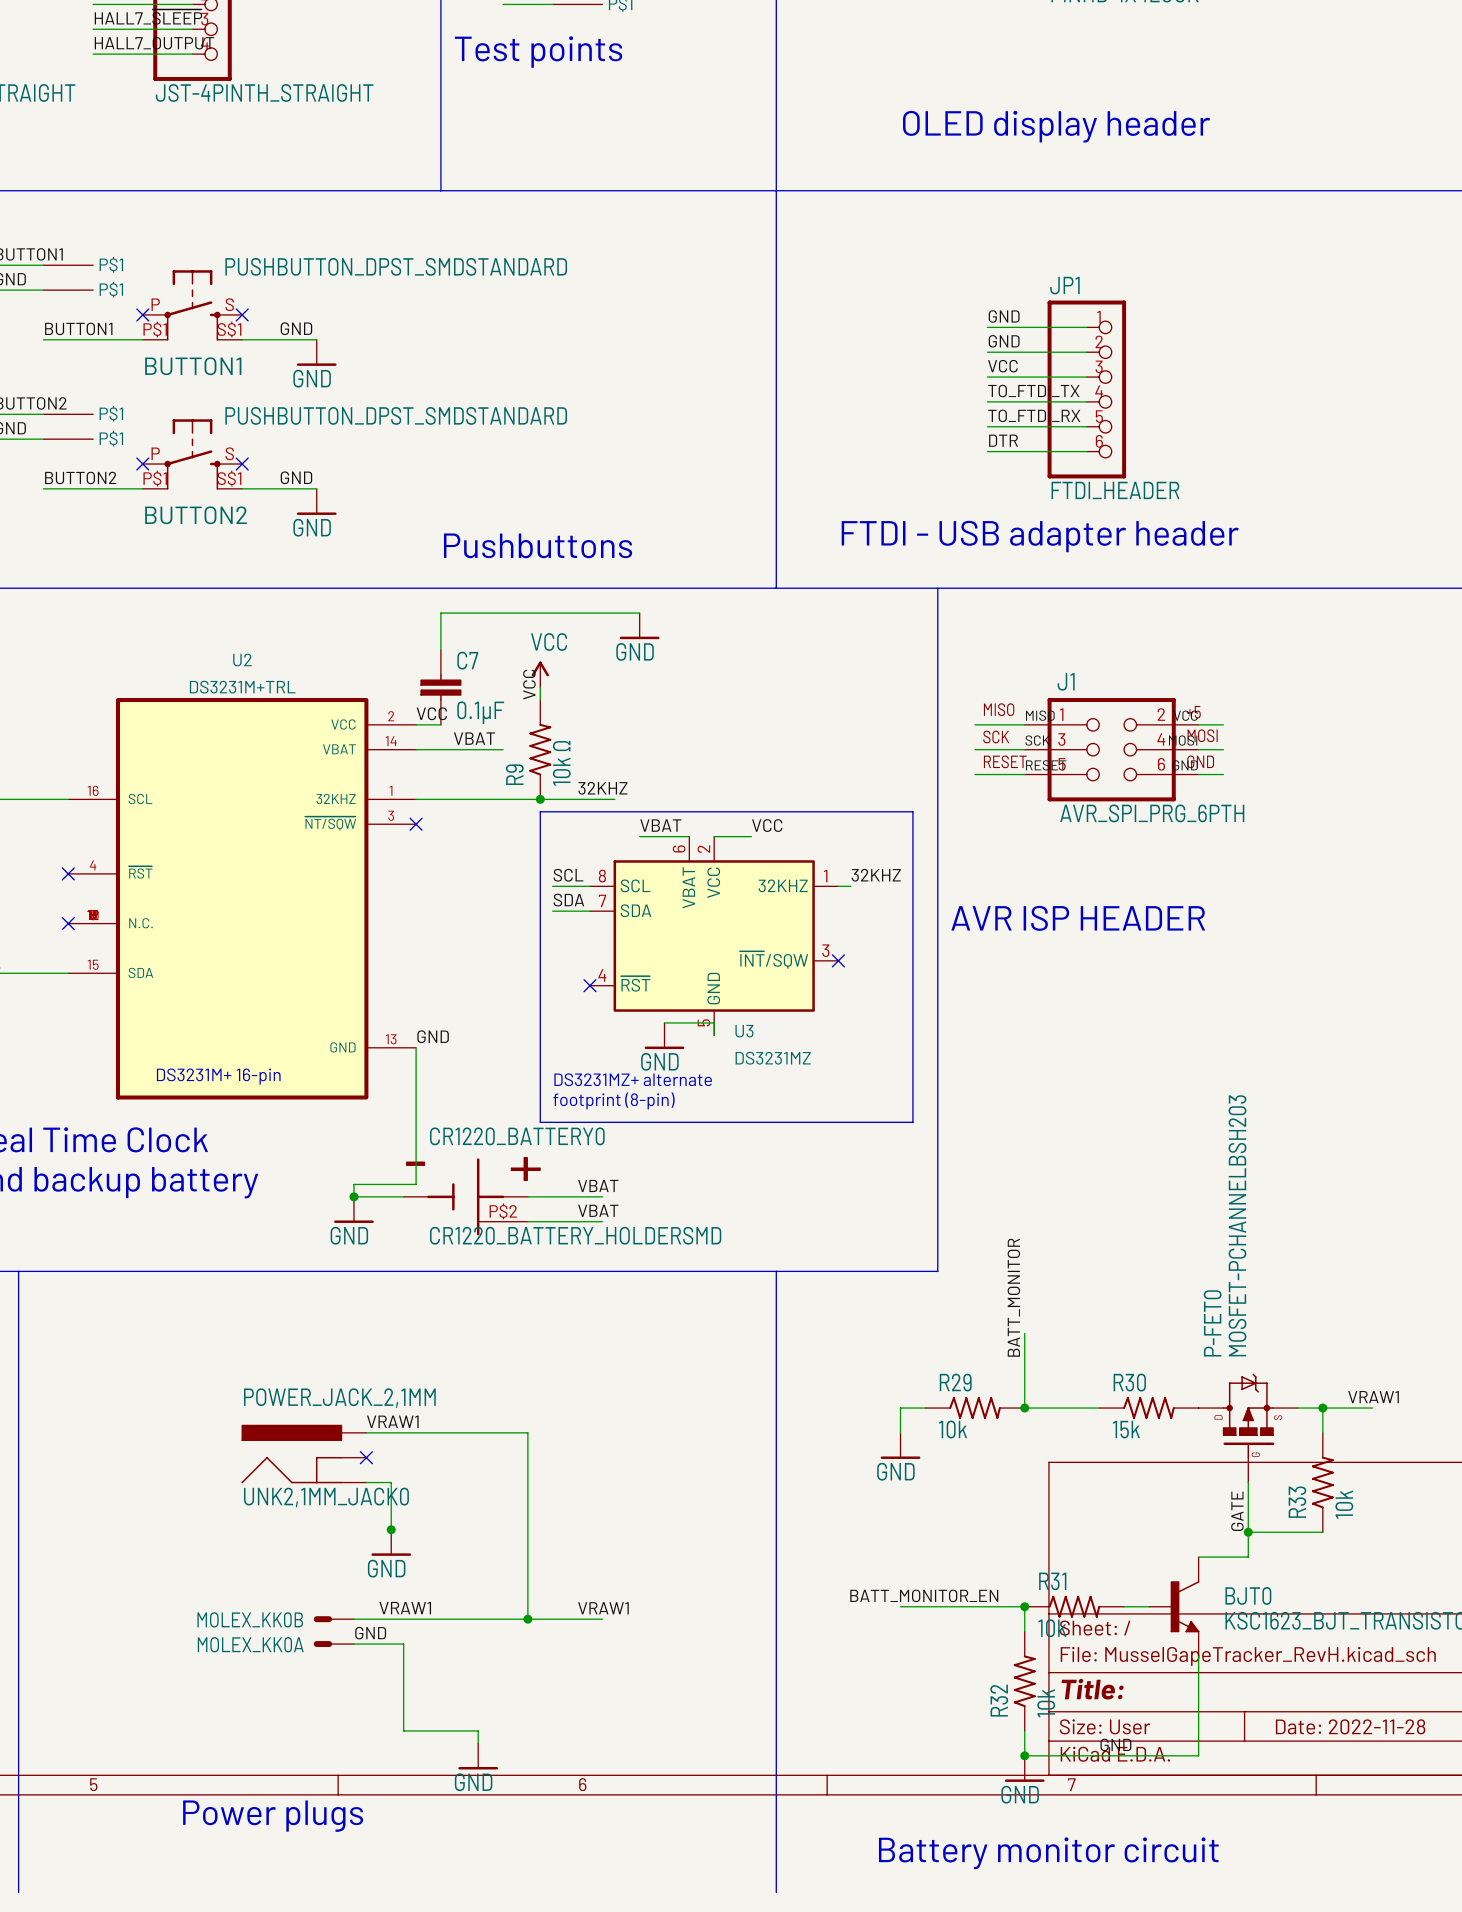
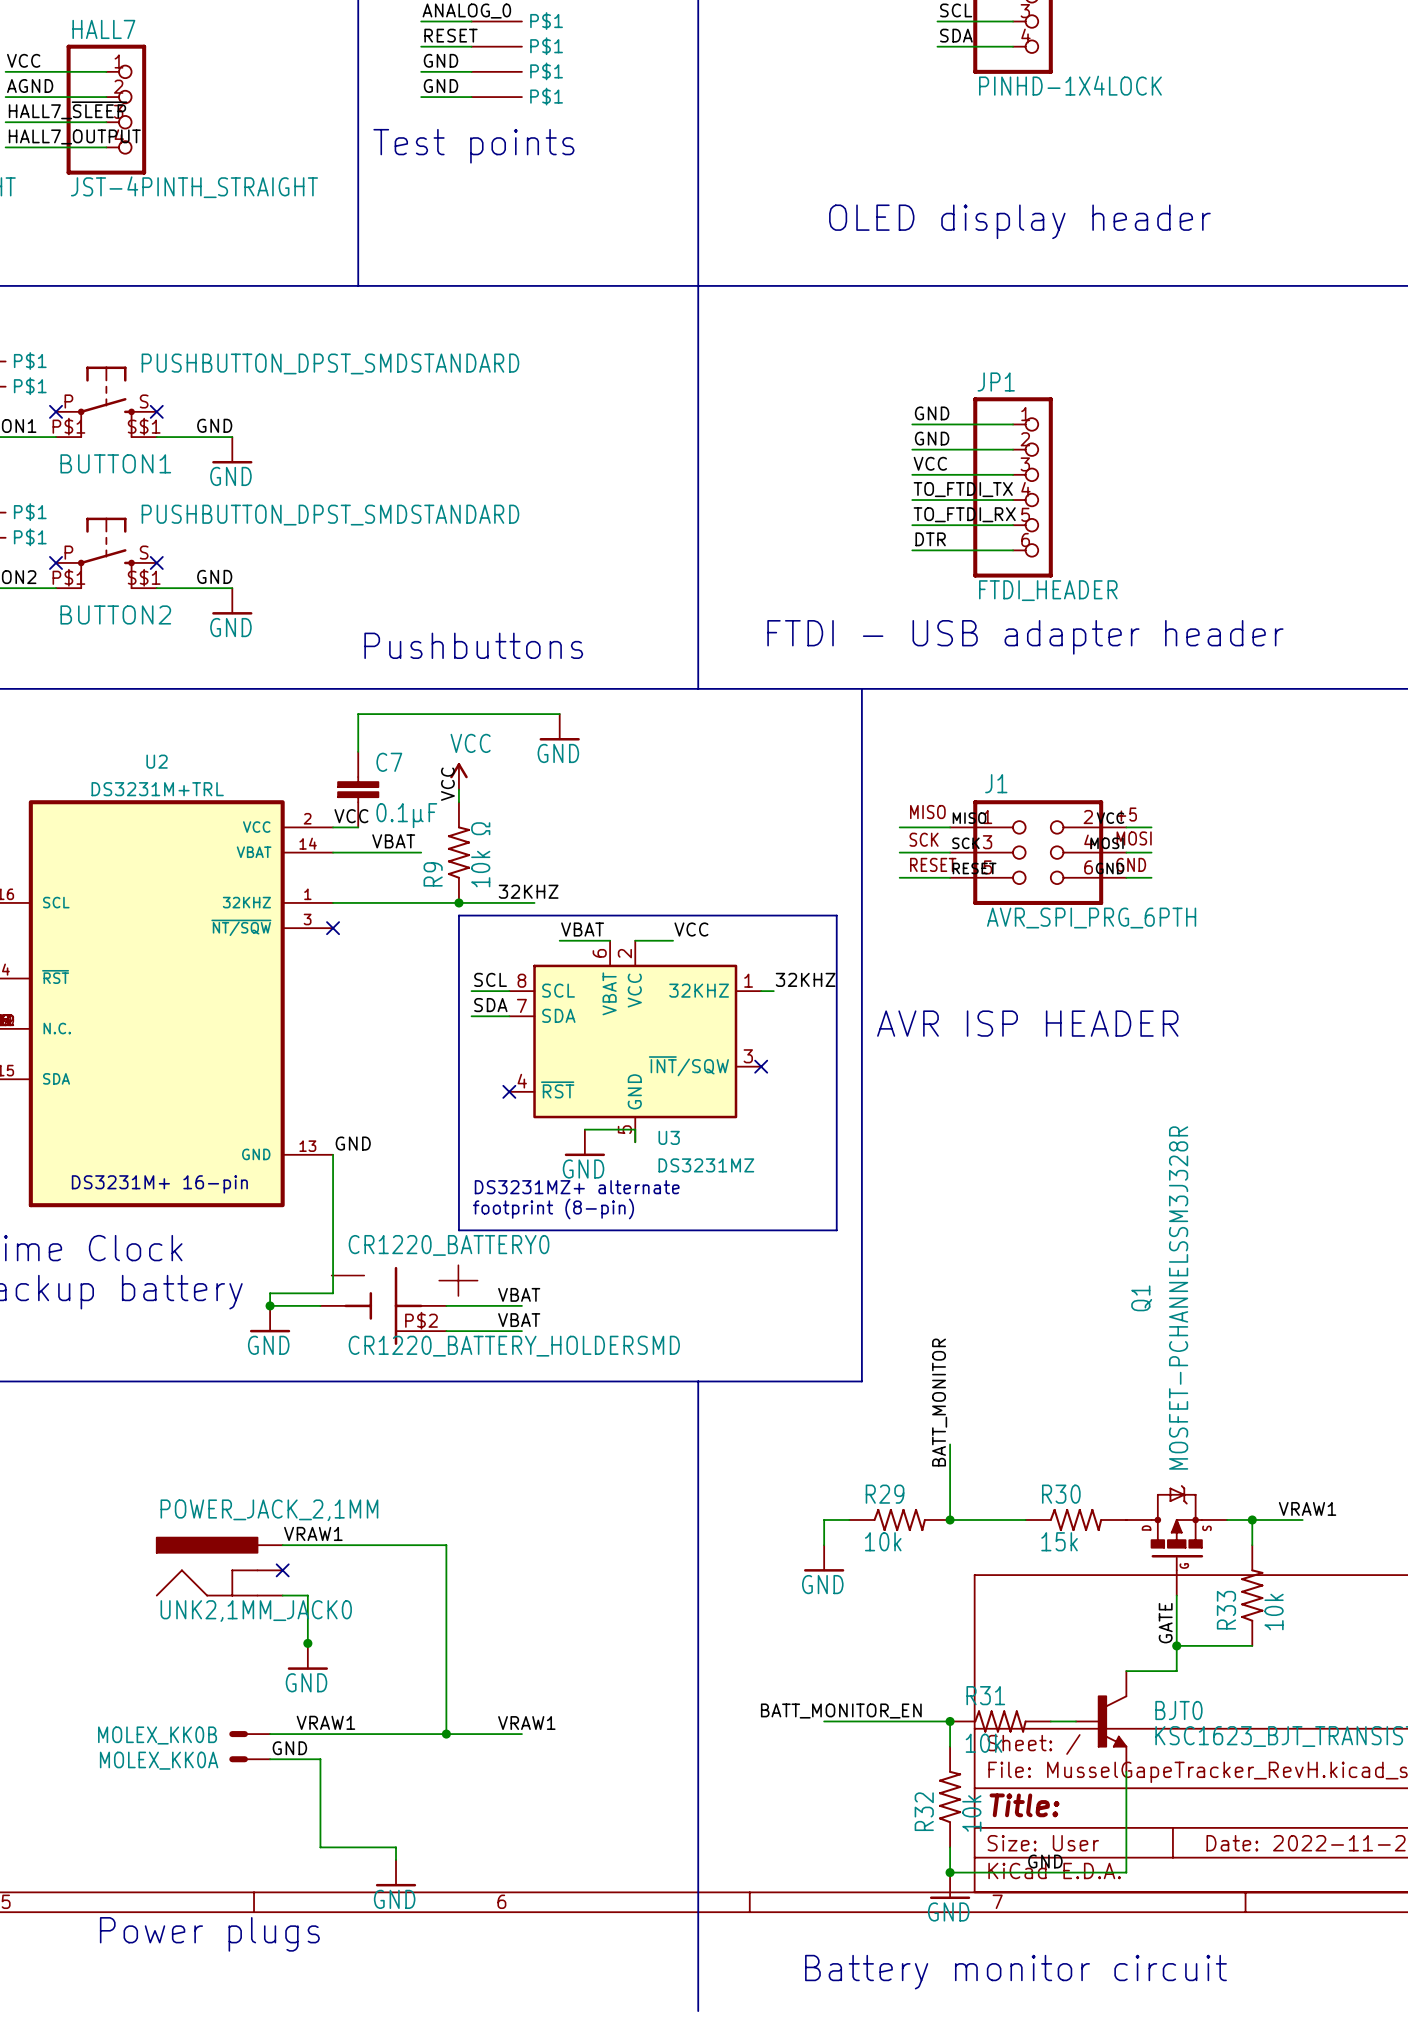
P-FET0 value: MOSFET-PCHANNELBSH203 (1237, 1225) -> MOSFET-PCHANNELSSM3J328R (1178, 1298)
P-FET0 name: P-FET0 (1212, 1323) -> Q1 (1141, 1298)

